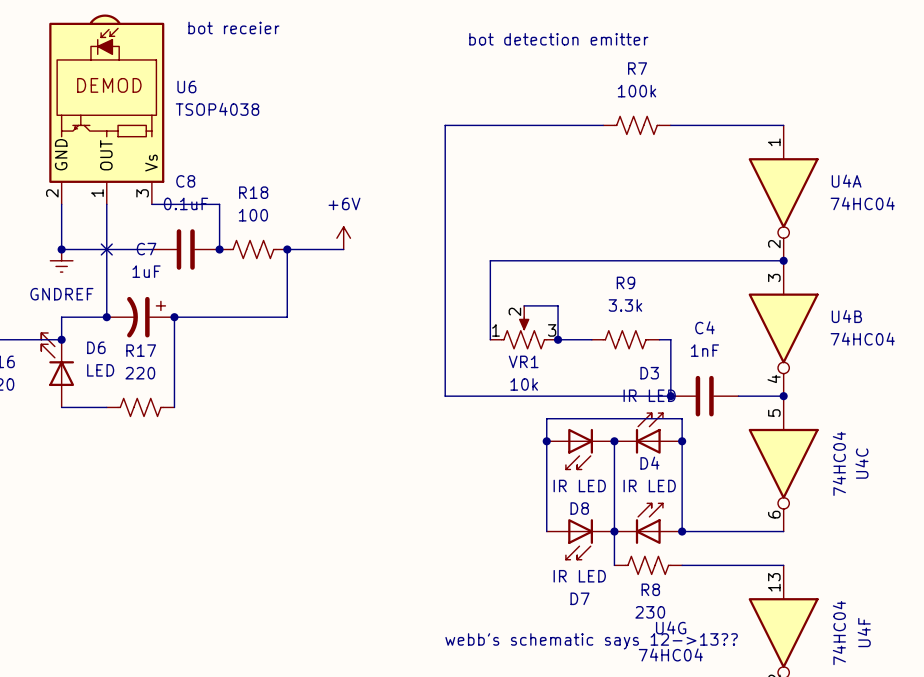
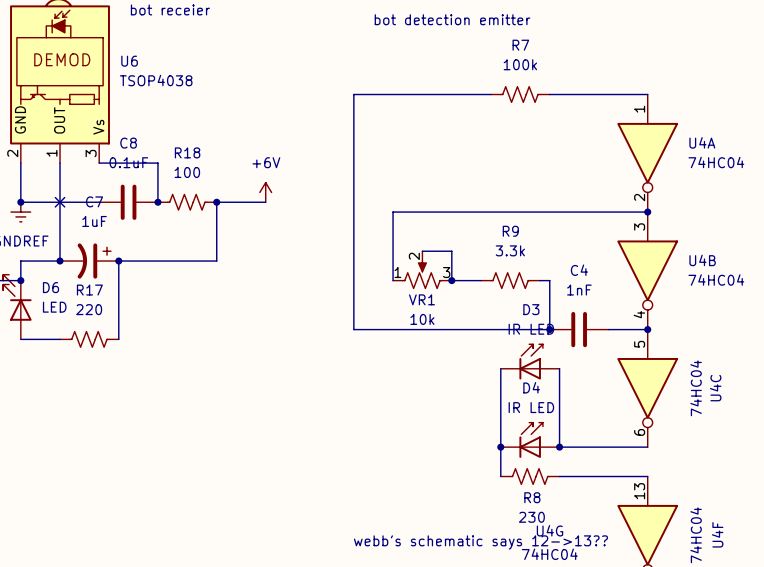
junction: (546, 441) -> none
junction: (614, 441) -> none
wire: (682, 441) (682, 418) (546, 418) (546, 531) -> none
junction: (682, 441) -> none
D8: IR LED (580, 449) -> none
D7: IR LED (580, 539) -> none

